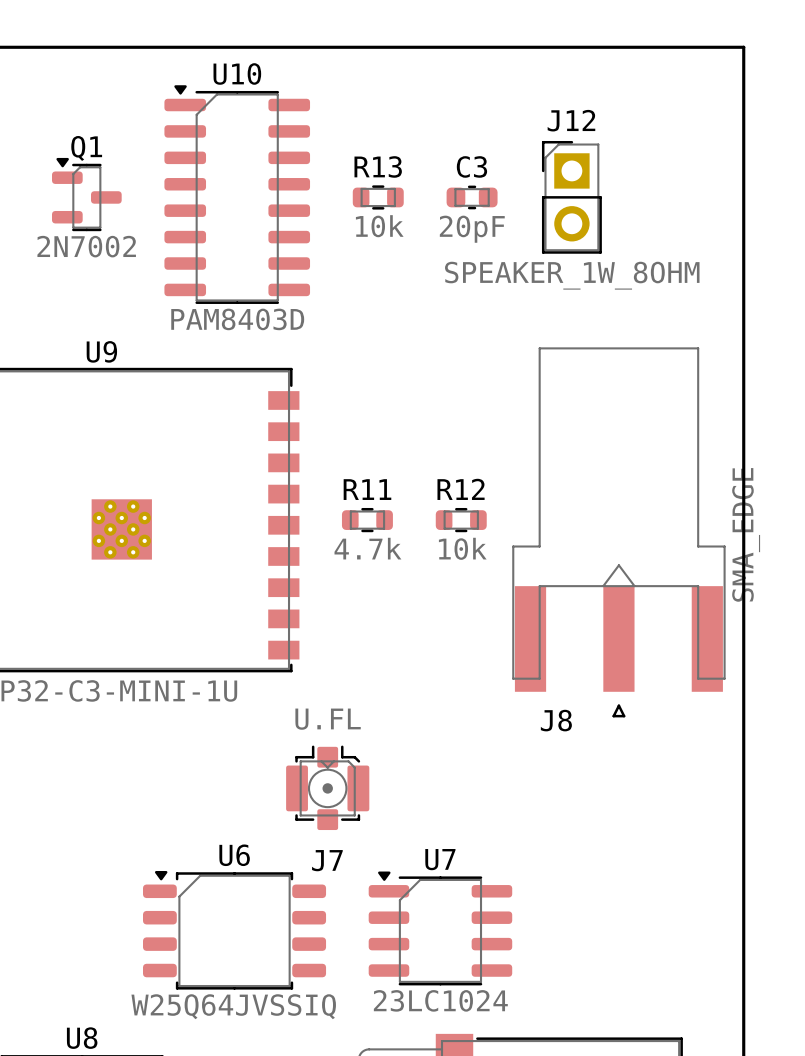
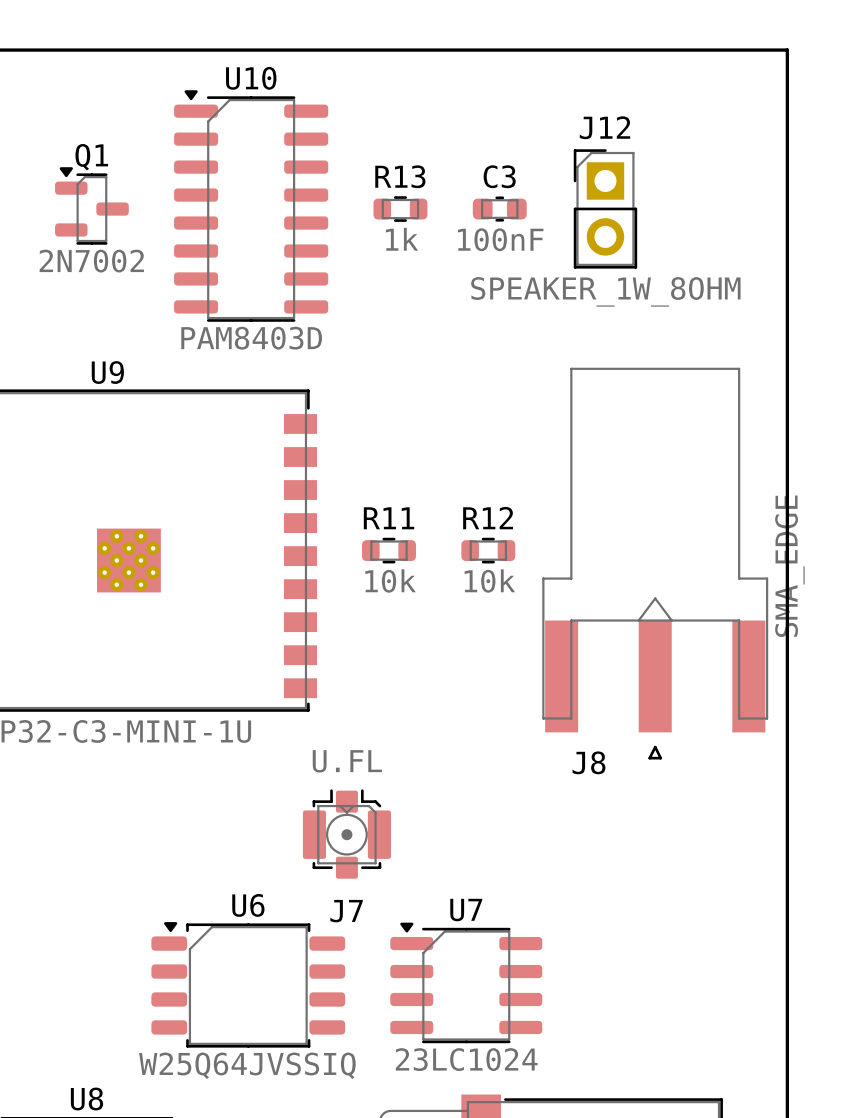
R13 value: 10k (379, 226) -> 1k (402, 239)
C3 value: 20pF (472, 229) -> 100nF (500, 239)
R11 value: 4.7k (367, 548) -> 10k (390, 581)

